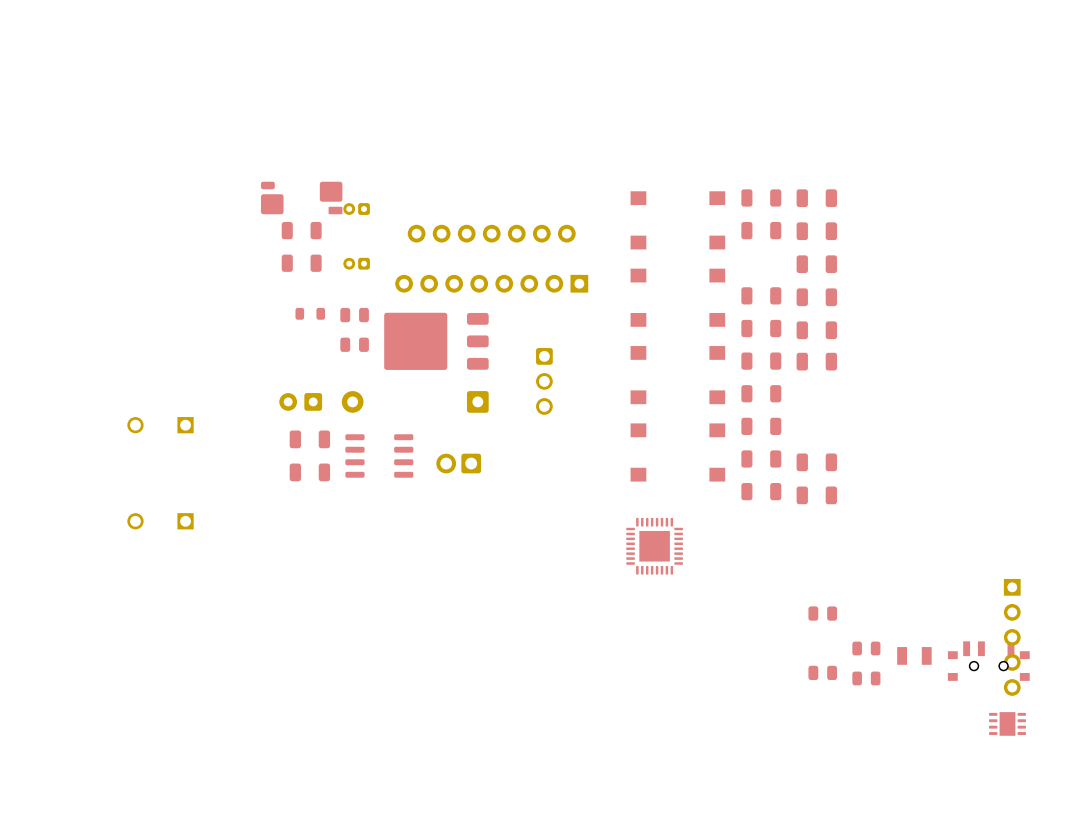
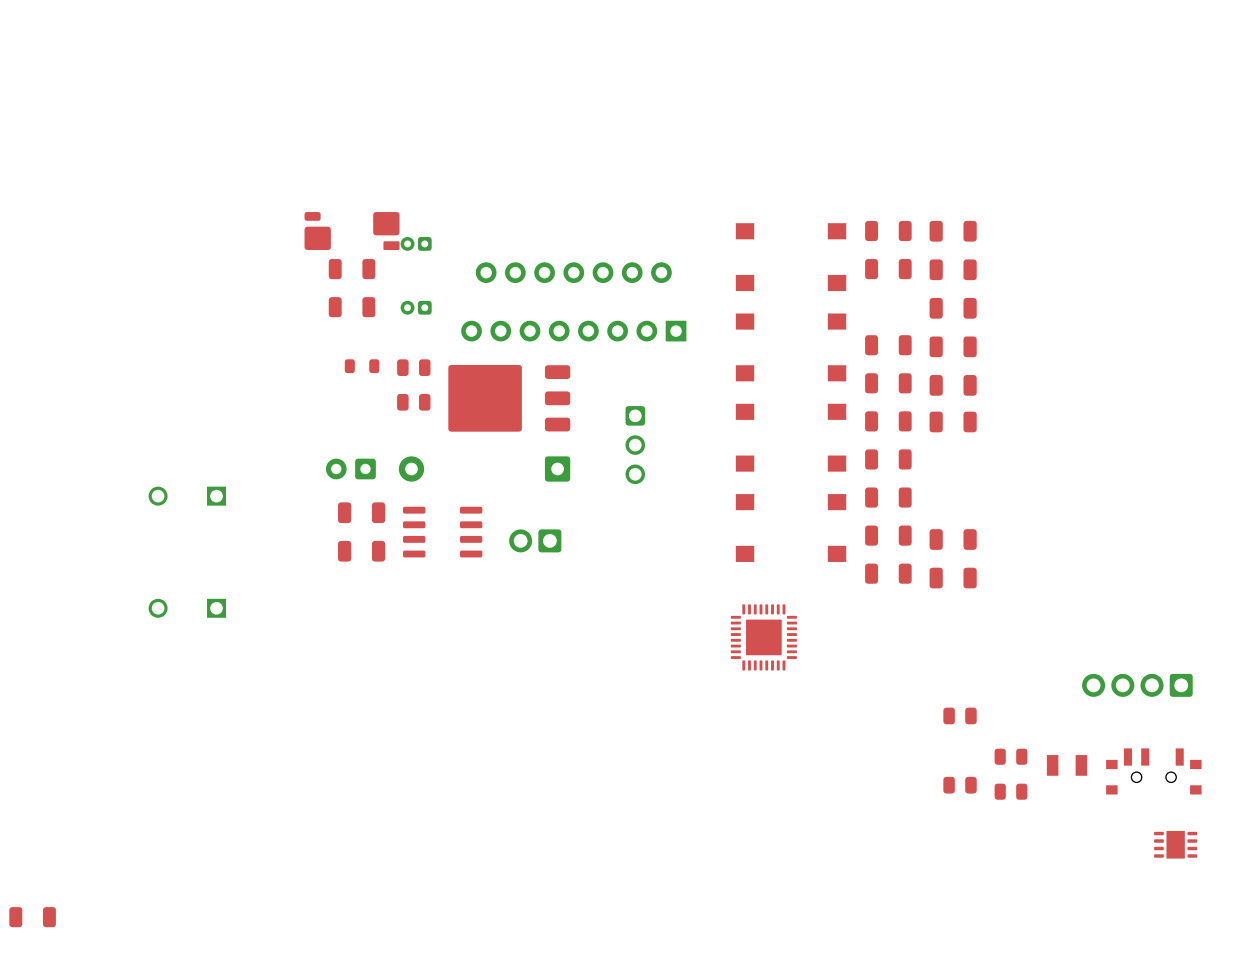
part: none -> (1137, 685)
part: (1012, 637) -> none
part: none -> (32, 917)

